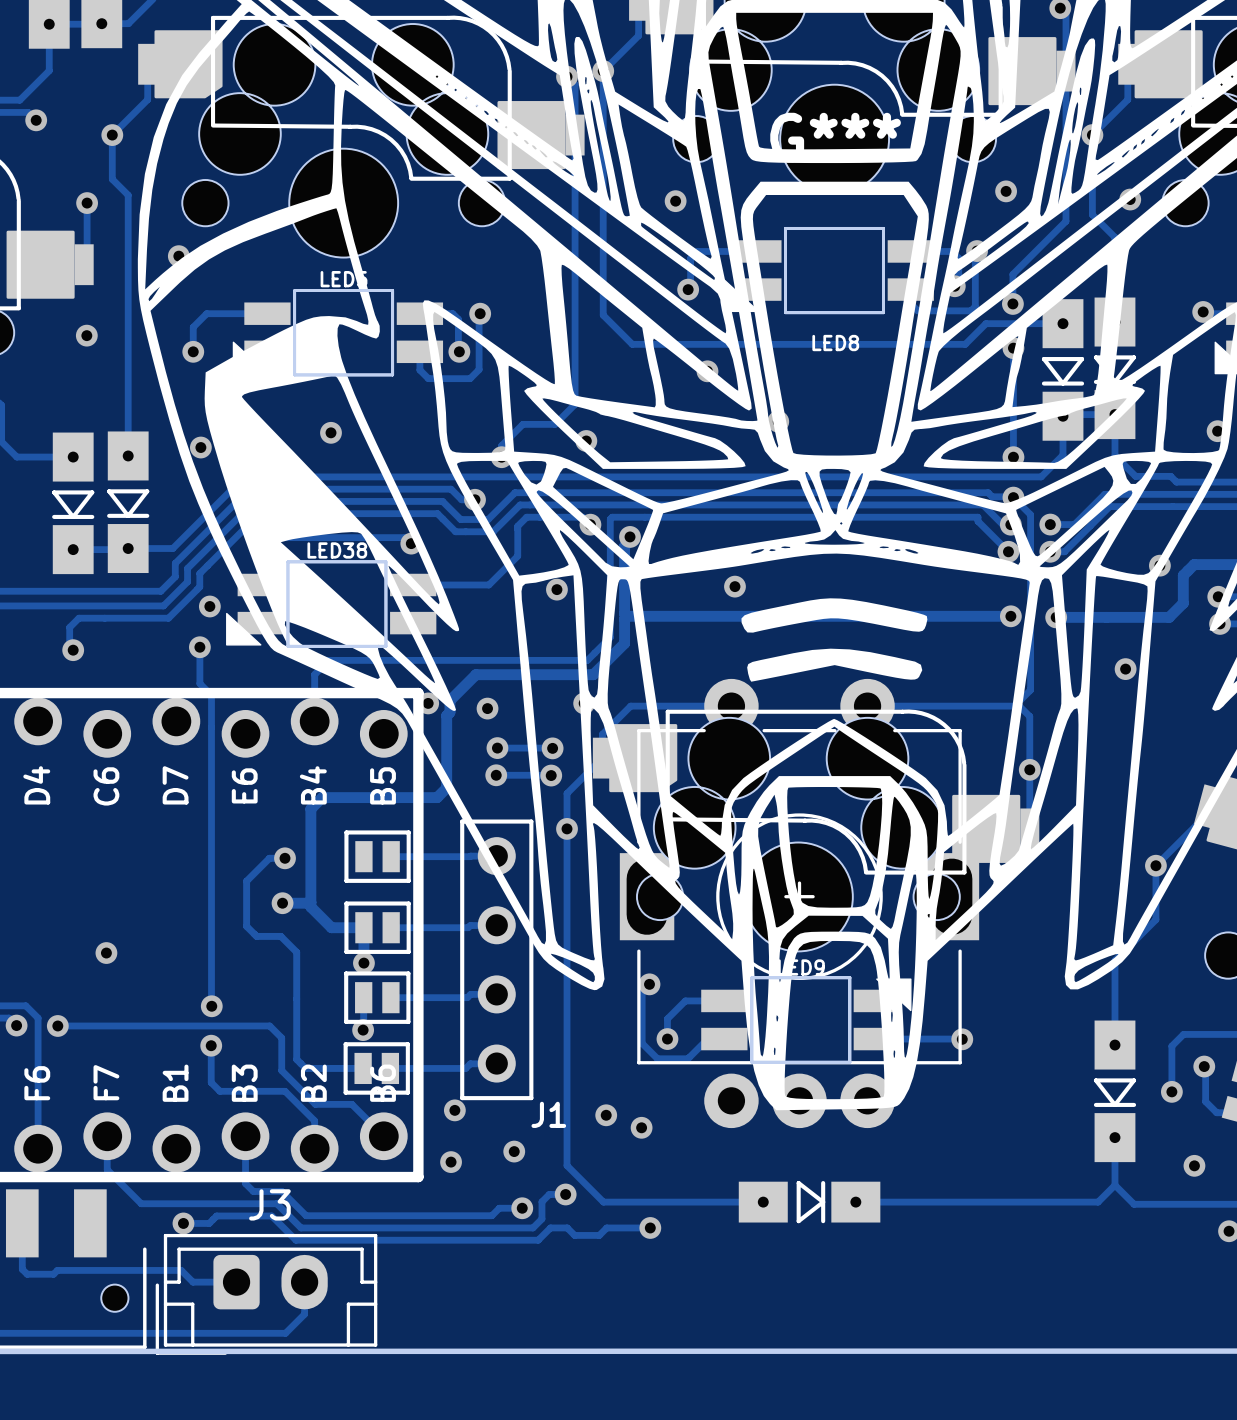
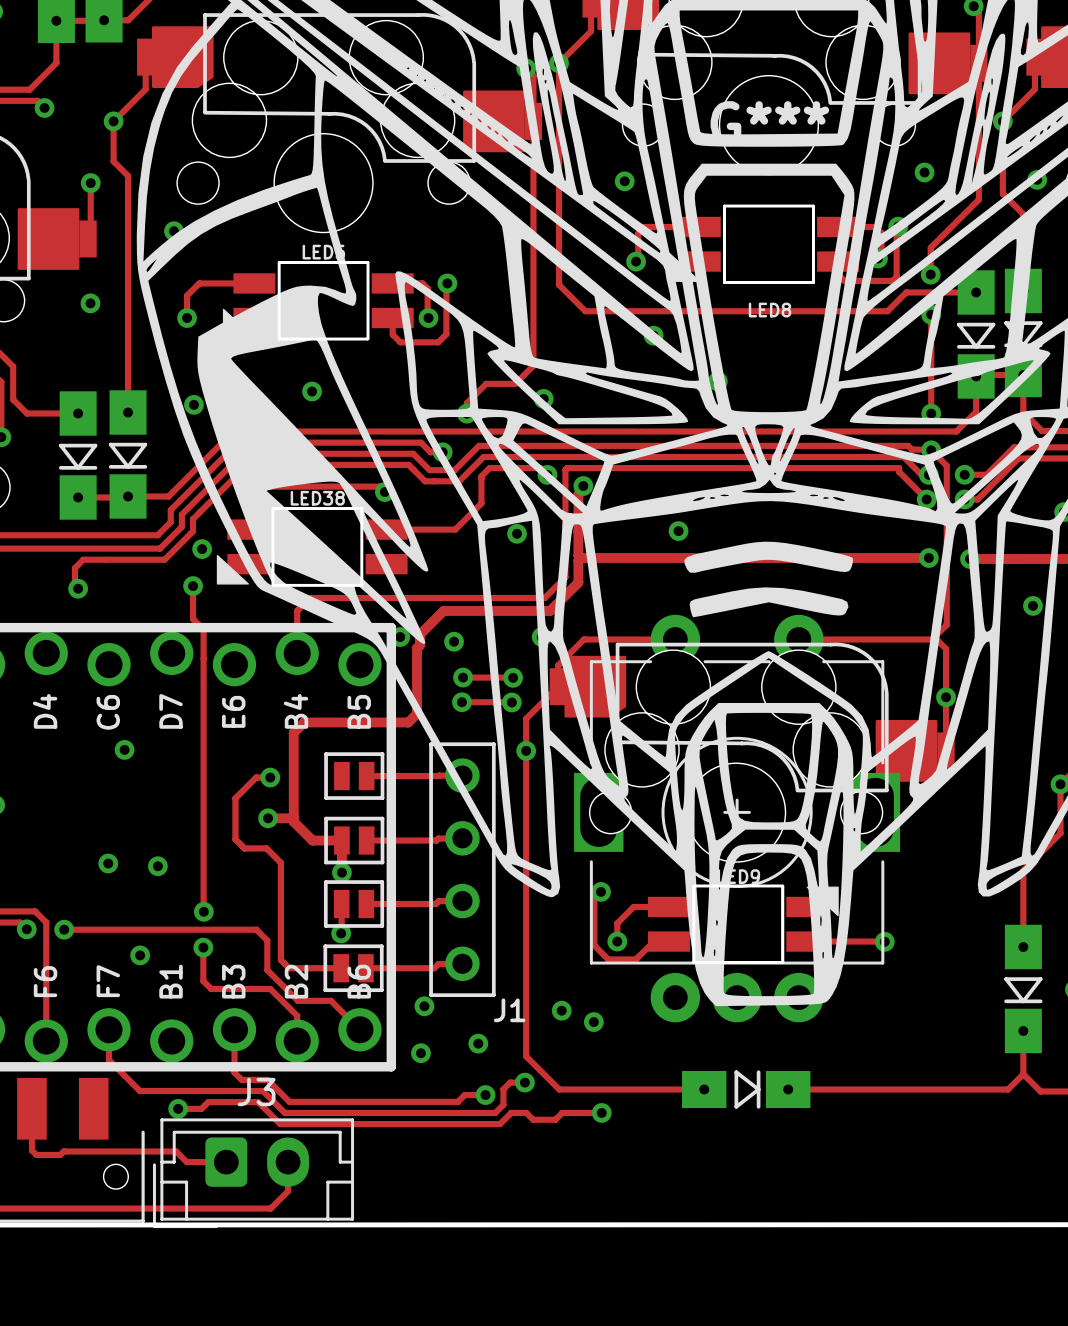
via: none -> (124, 749)
via: none -> (157, 866)
via: none -> (140, 955)

